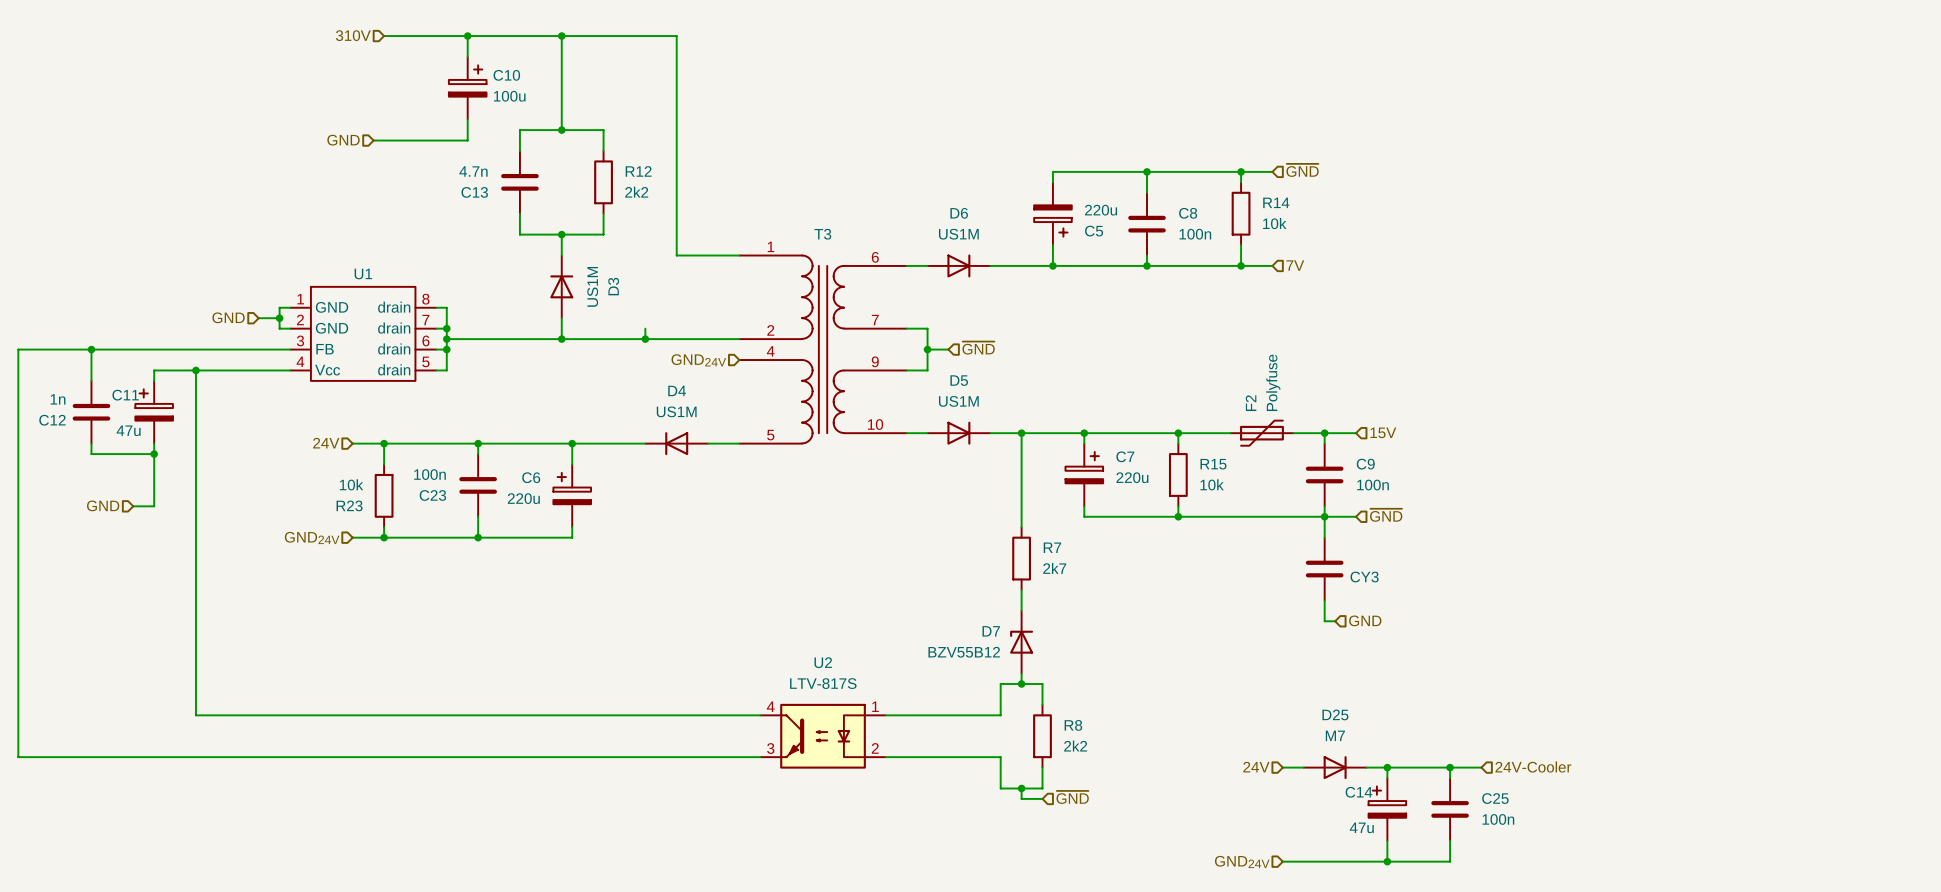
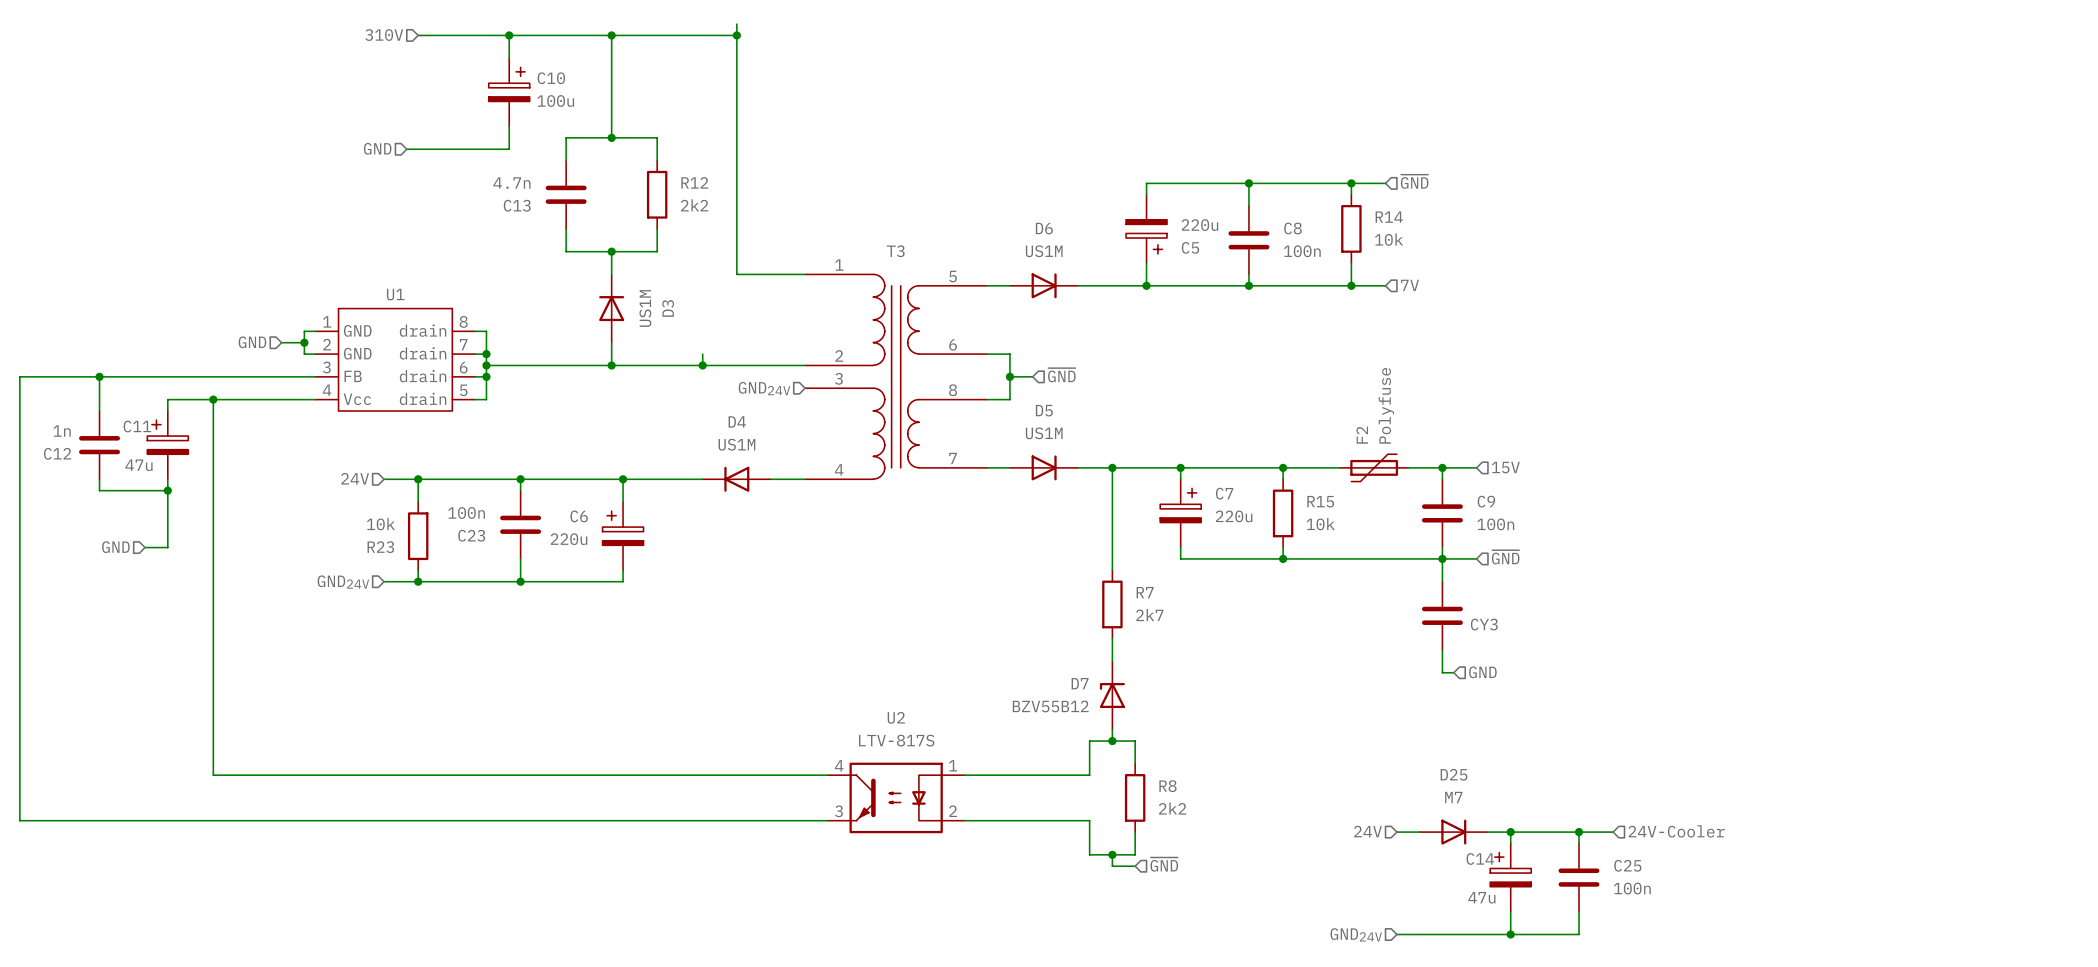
wire: none -> (736, 24) (736, 35)
junction: none -> (736, 35)
T3 pin number: 6 (875, 257) -> 5 (953, 276)
T3 pin number: 7 (875, 320) -> 6 (953, 344)
T3 pin number: 4 (770, 351) -> 3 (838, 378)
T3 pin number: 9 (875, 361) -> 8 (953, 390)
T3 pin number: 10 (875, 424) -> 7 (953, 458)
T3 pin number: 5 (770, 435) -> 4 (839, 469)

